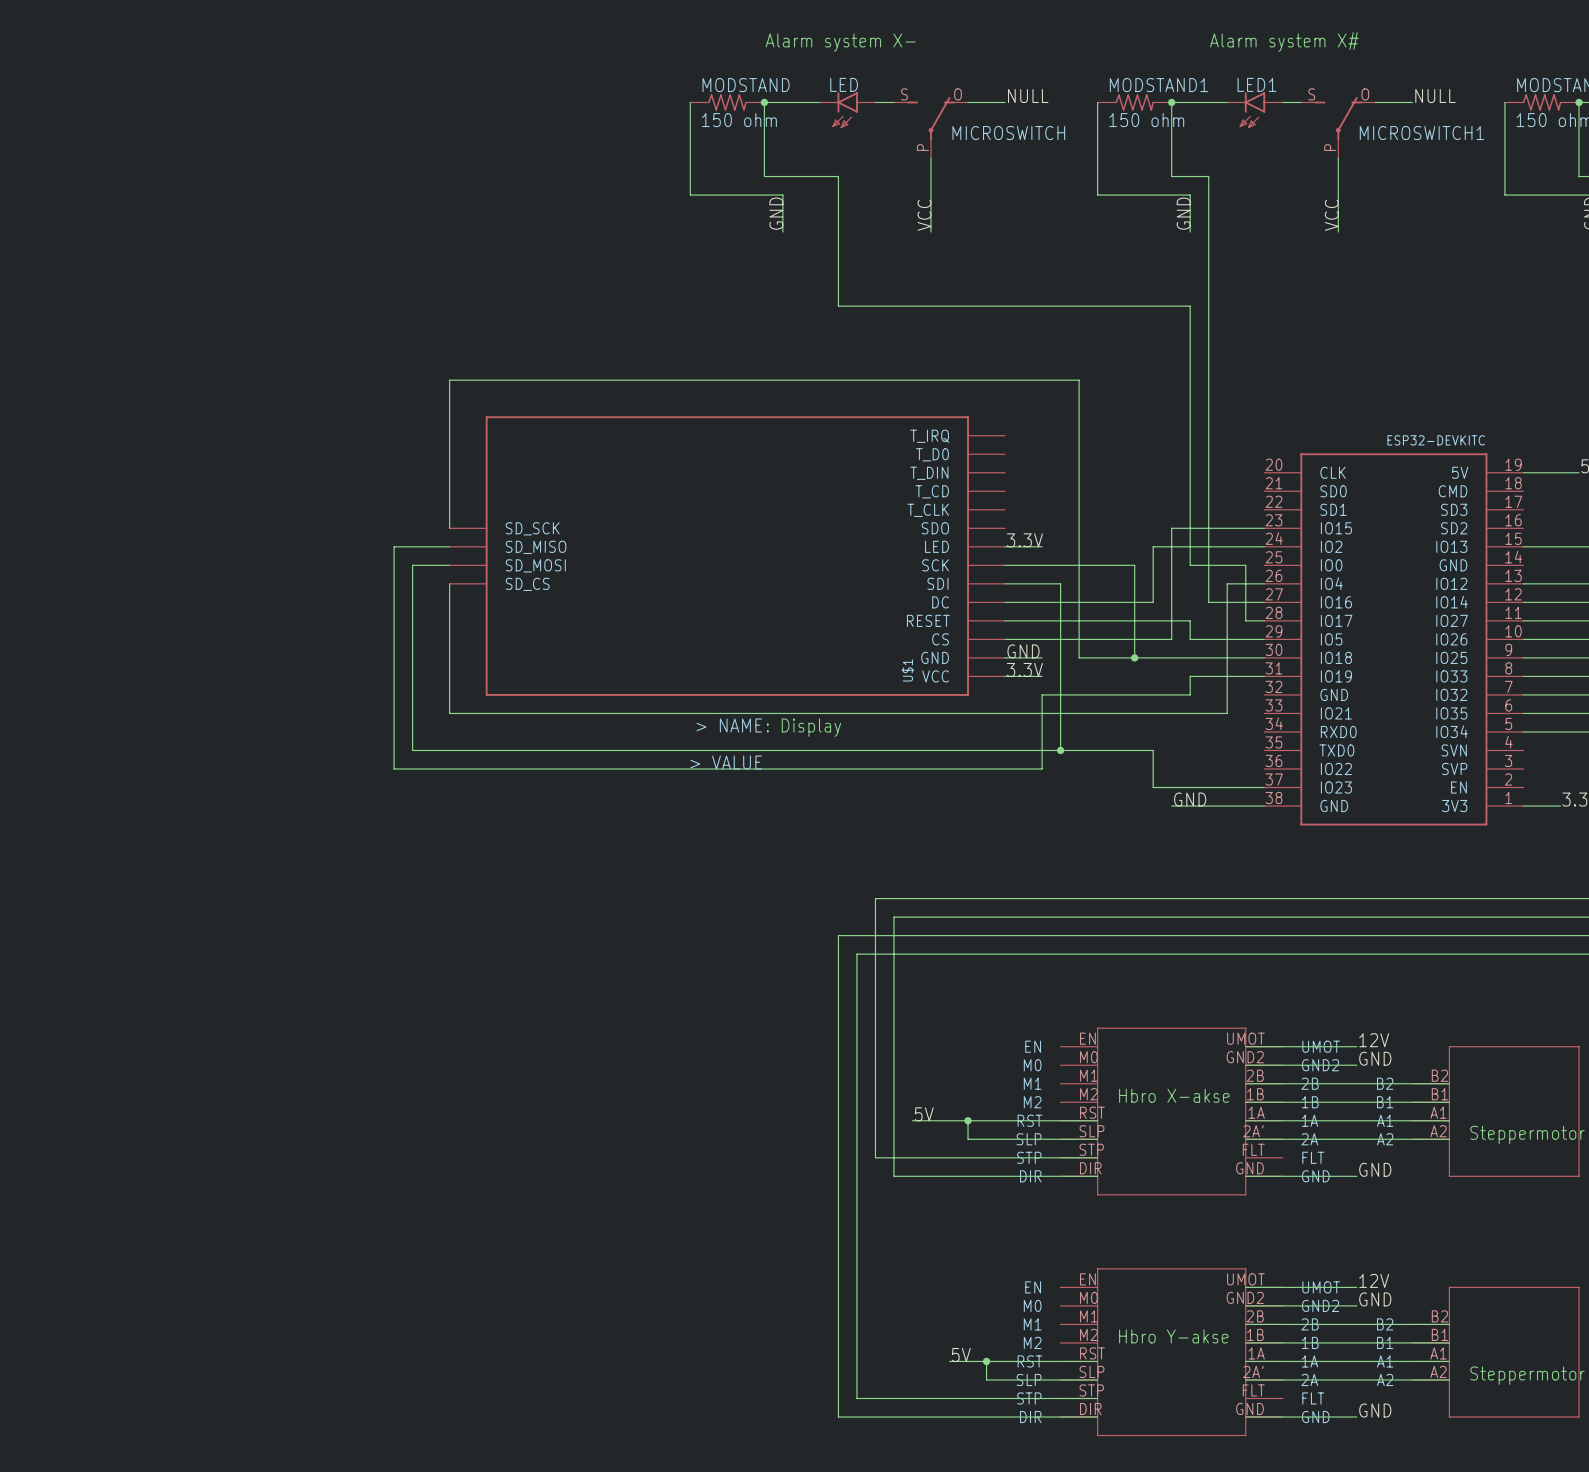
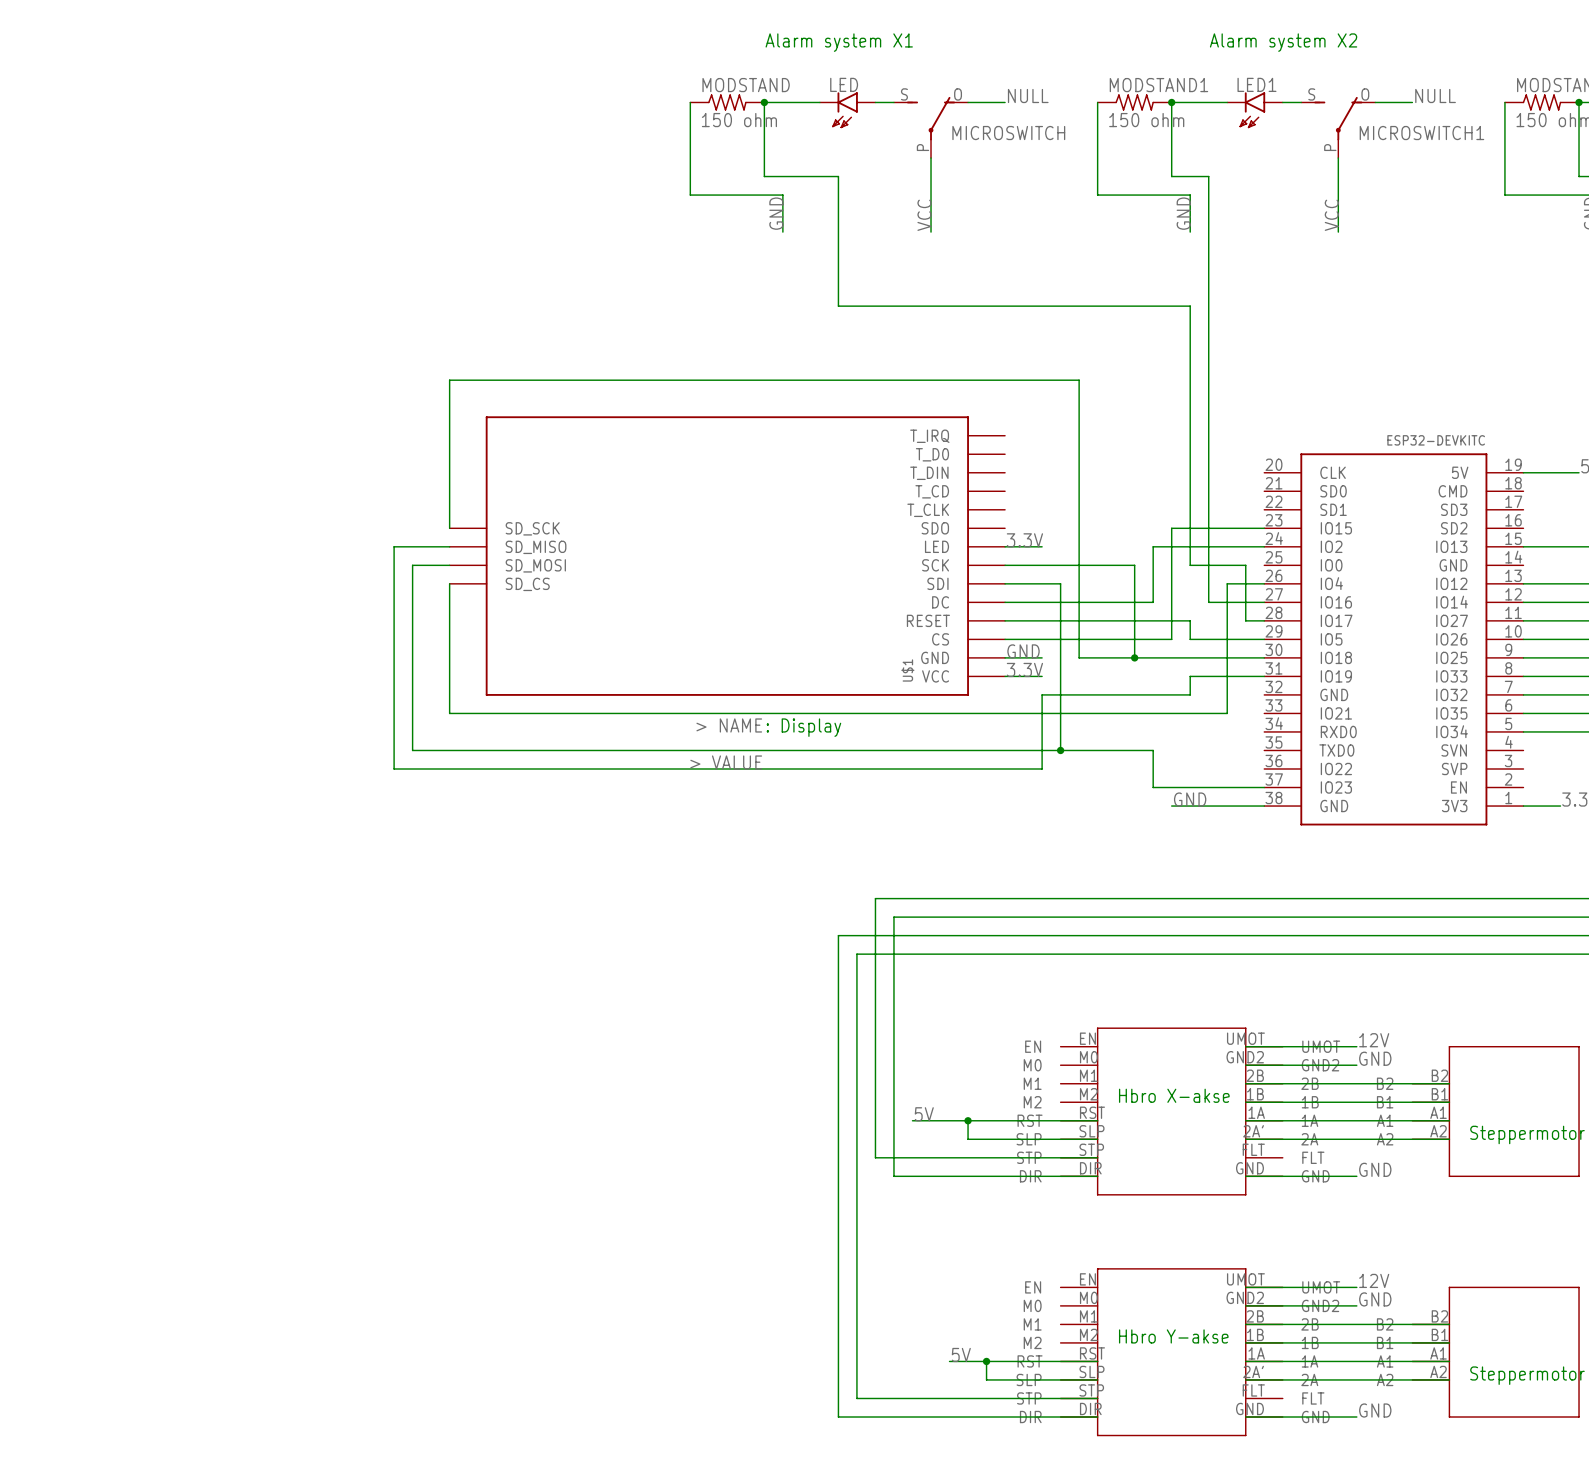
text: Alarm system X# (1284, 41) -> Alarm system X2 (1283, 42)
text: Alarm system X- (840, 42) -> Alarm system X1 (839, 42)

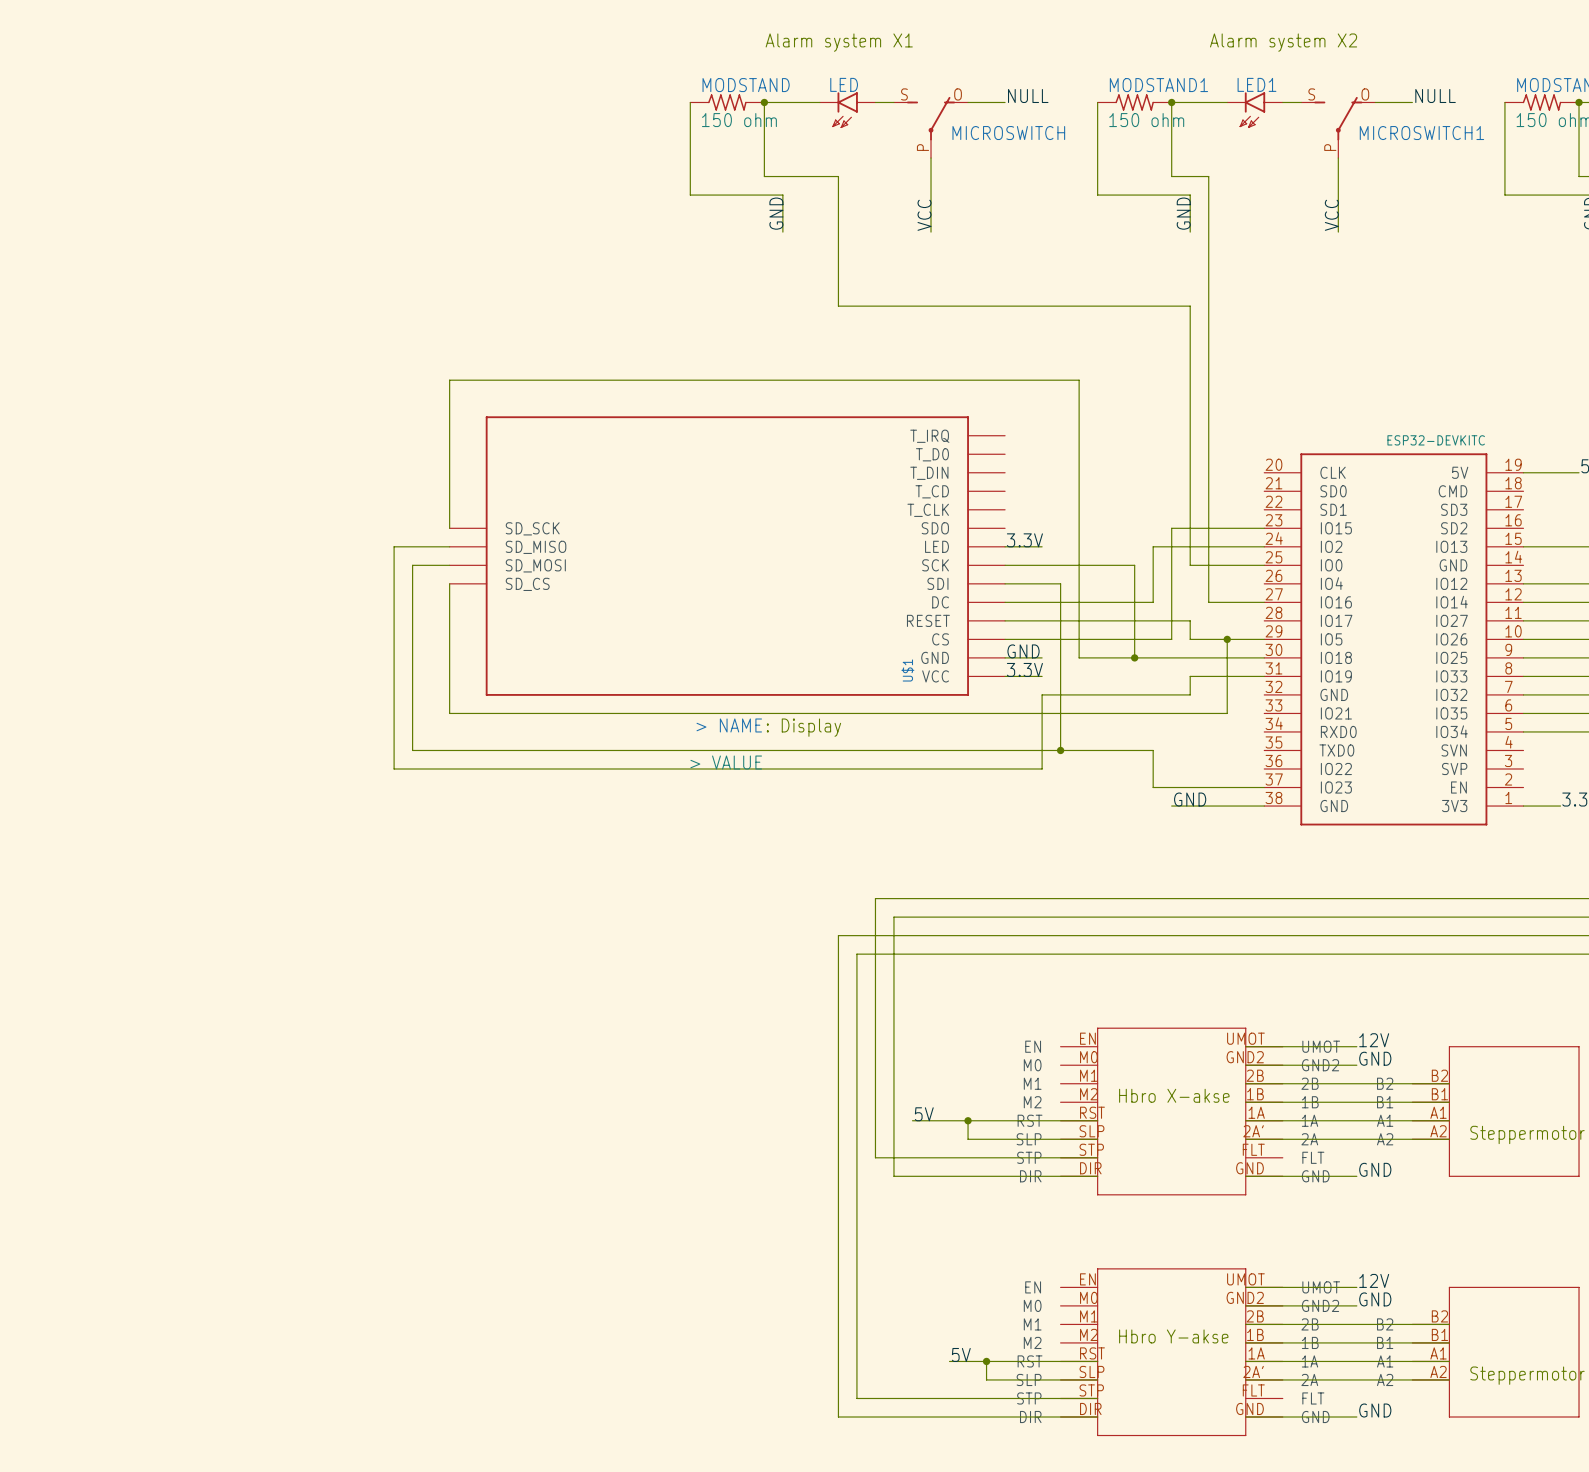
wire: (1245, 565) (1245, 620) (1264, 620) -> (1245, 565) (1264, 565)
wire: (1264, 583) (1227, 583) (1227, 639) -> none
junction: none -> (1227, 639)

